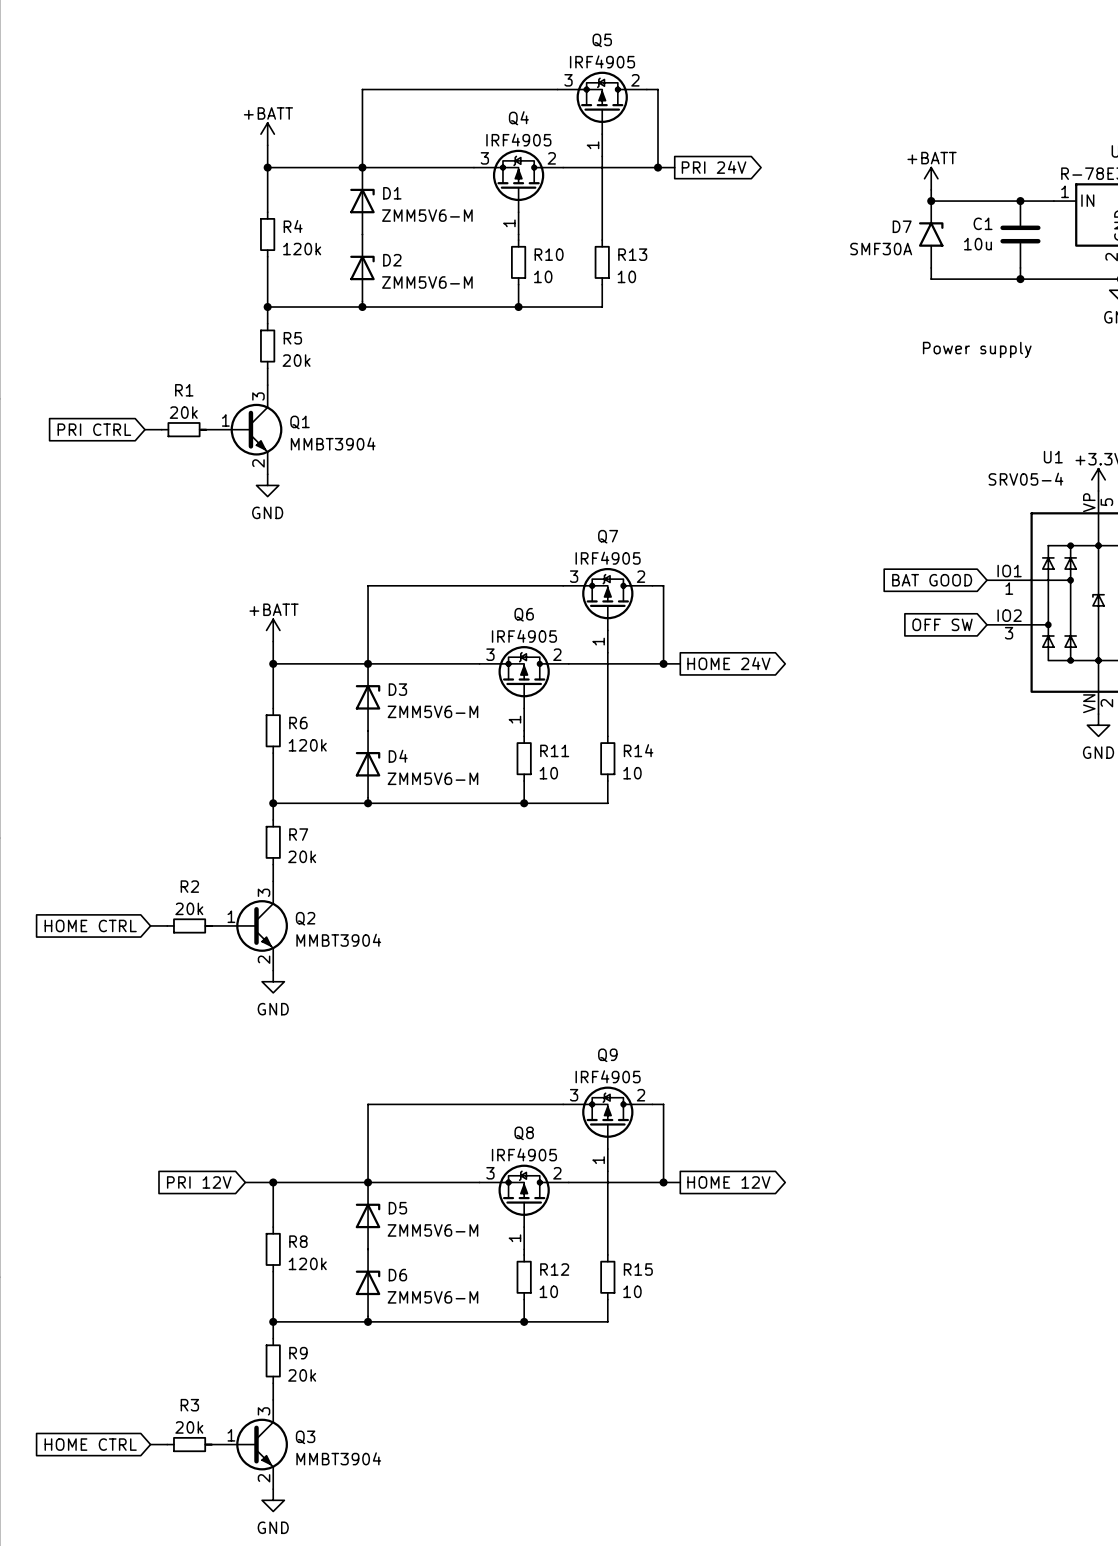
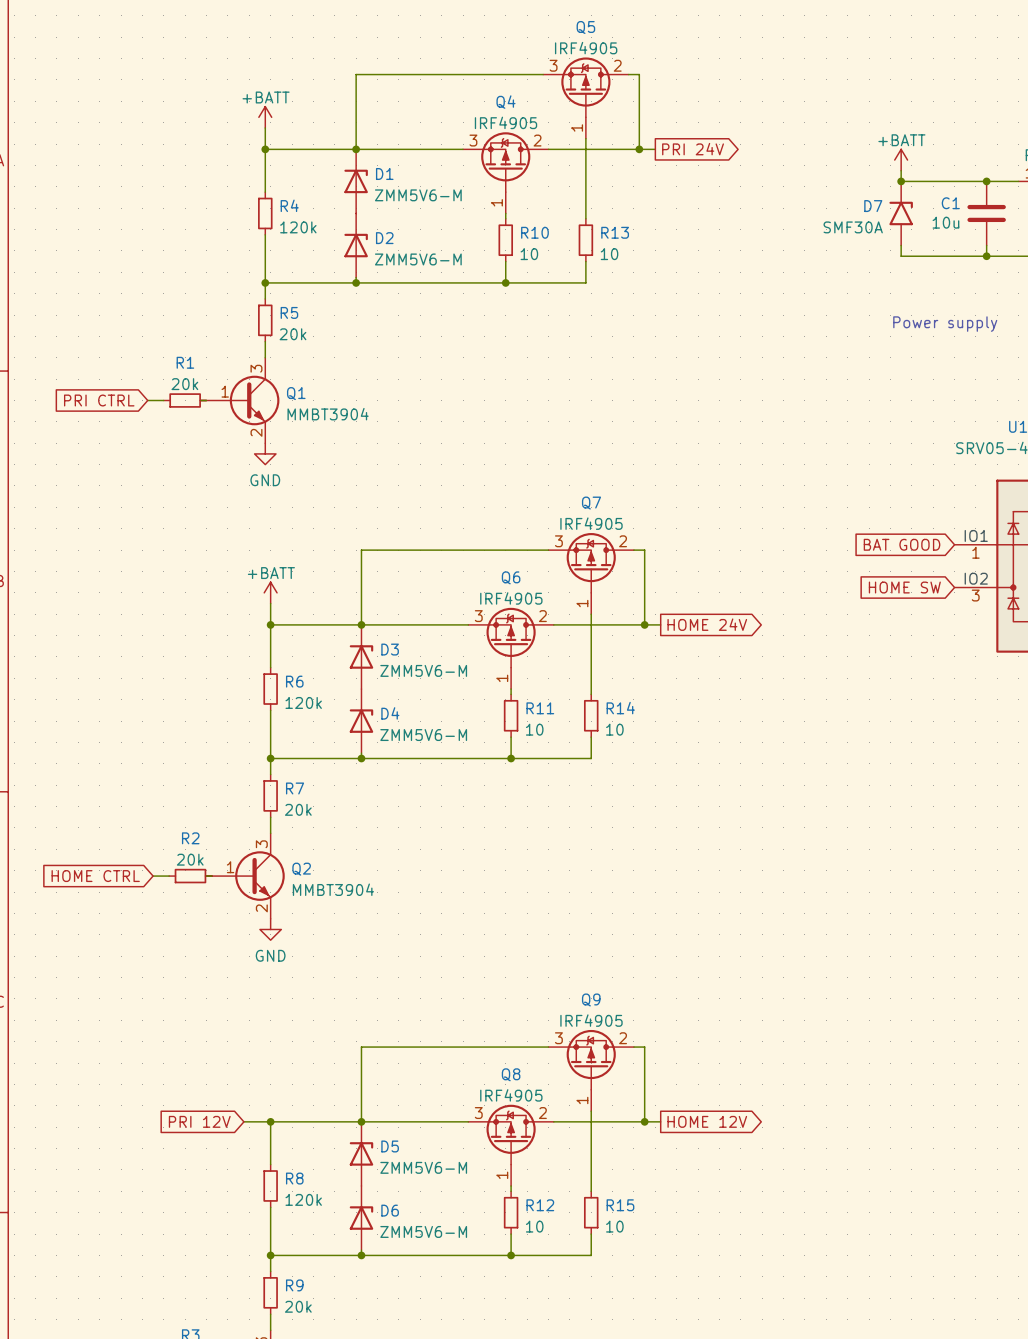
global label: OFF SW (942, 624) -> HOME SW (904, 587)

